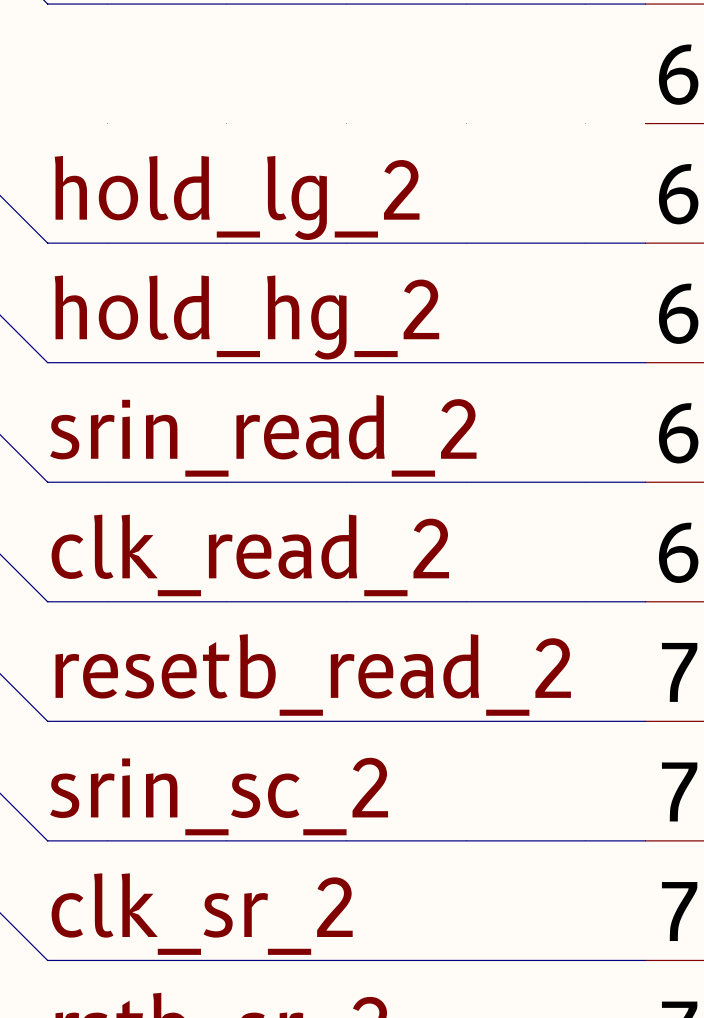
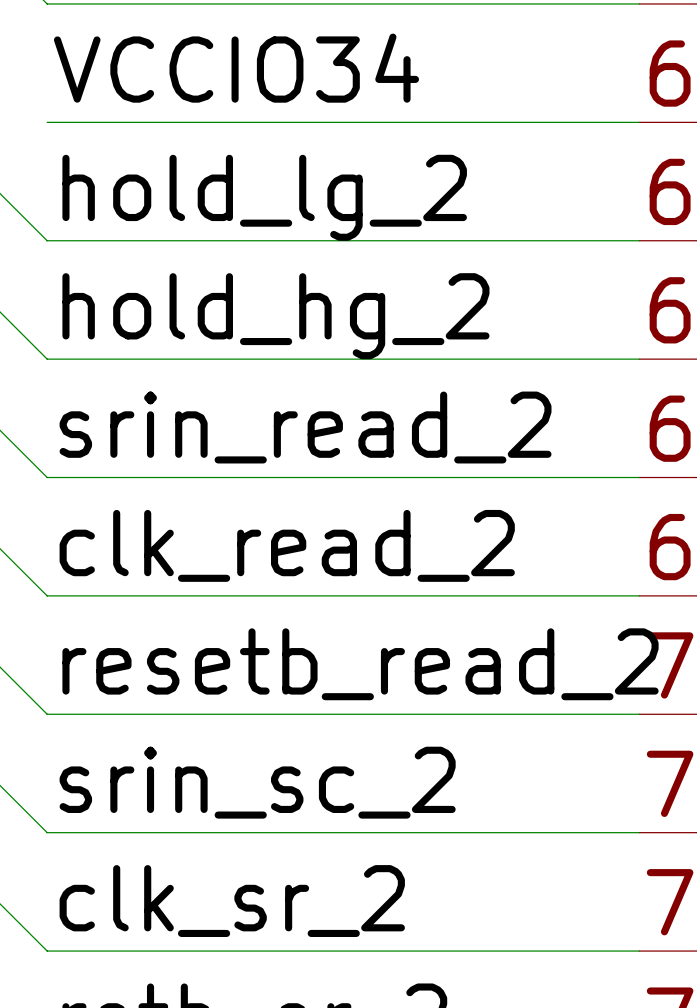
label: none -> VCCIO34 (236, 68)
wire: none -> (47, 122) (639, 122)

